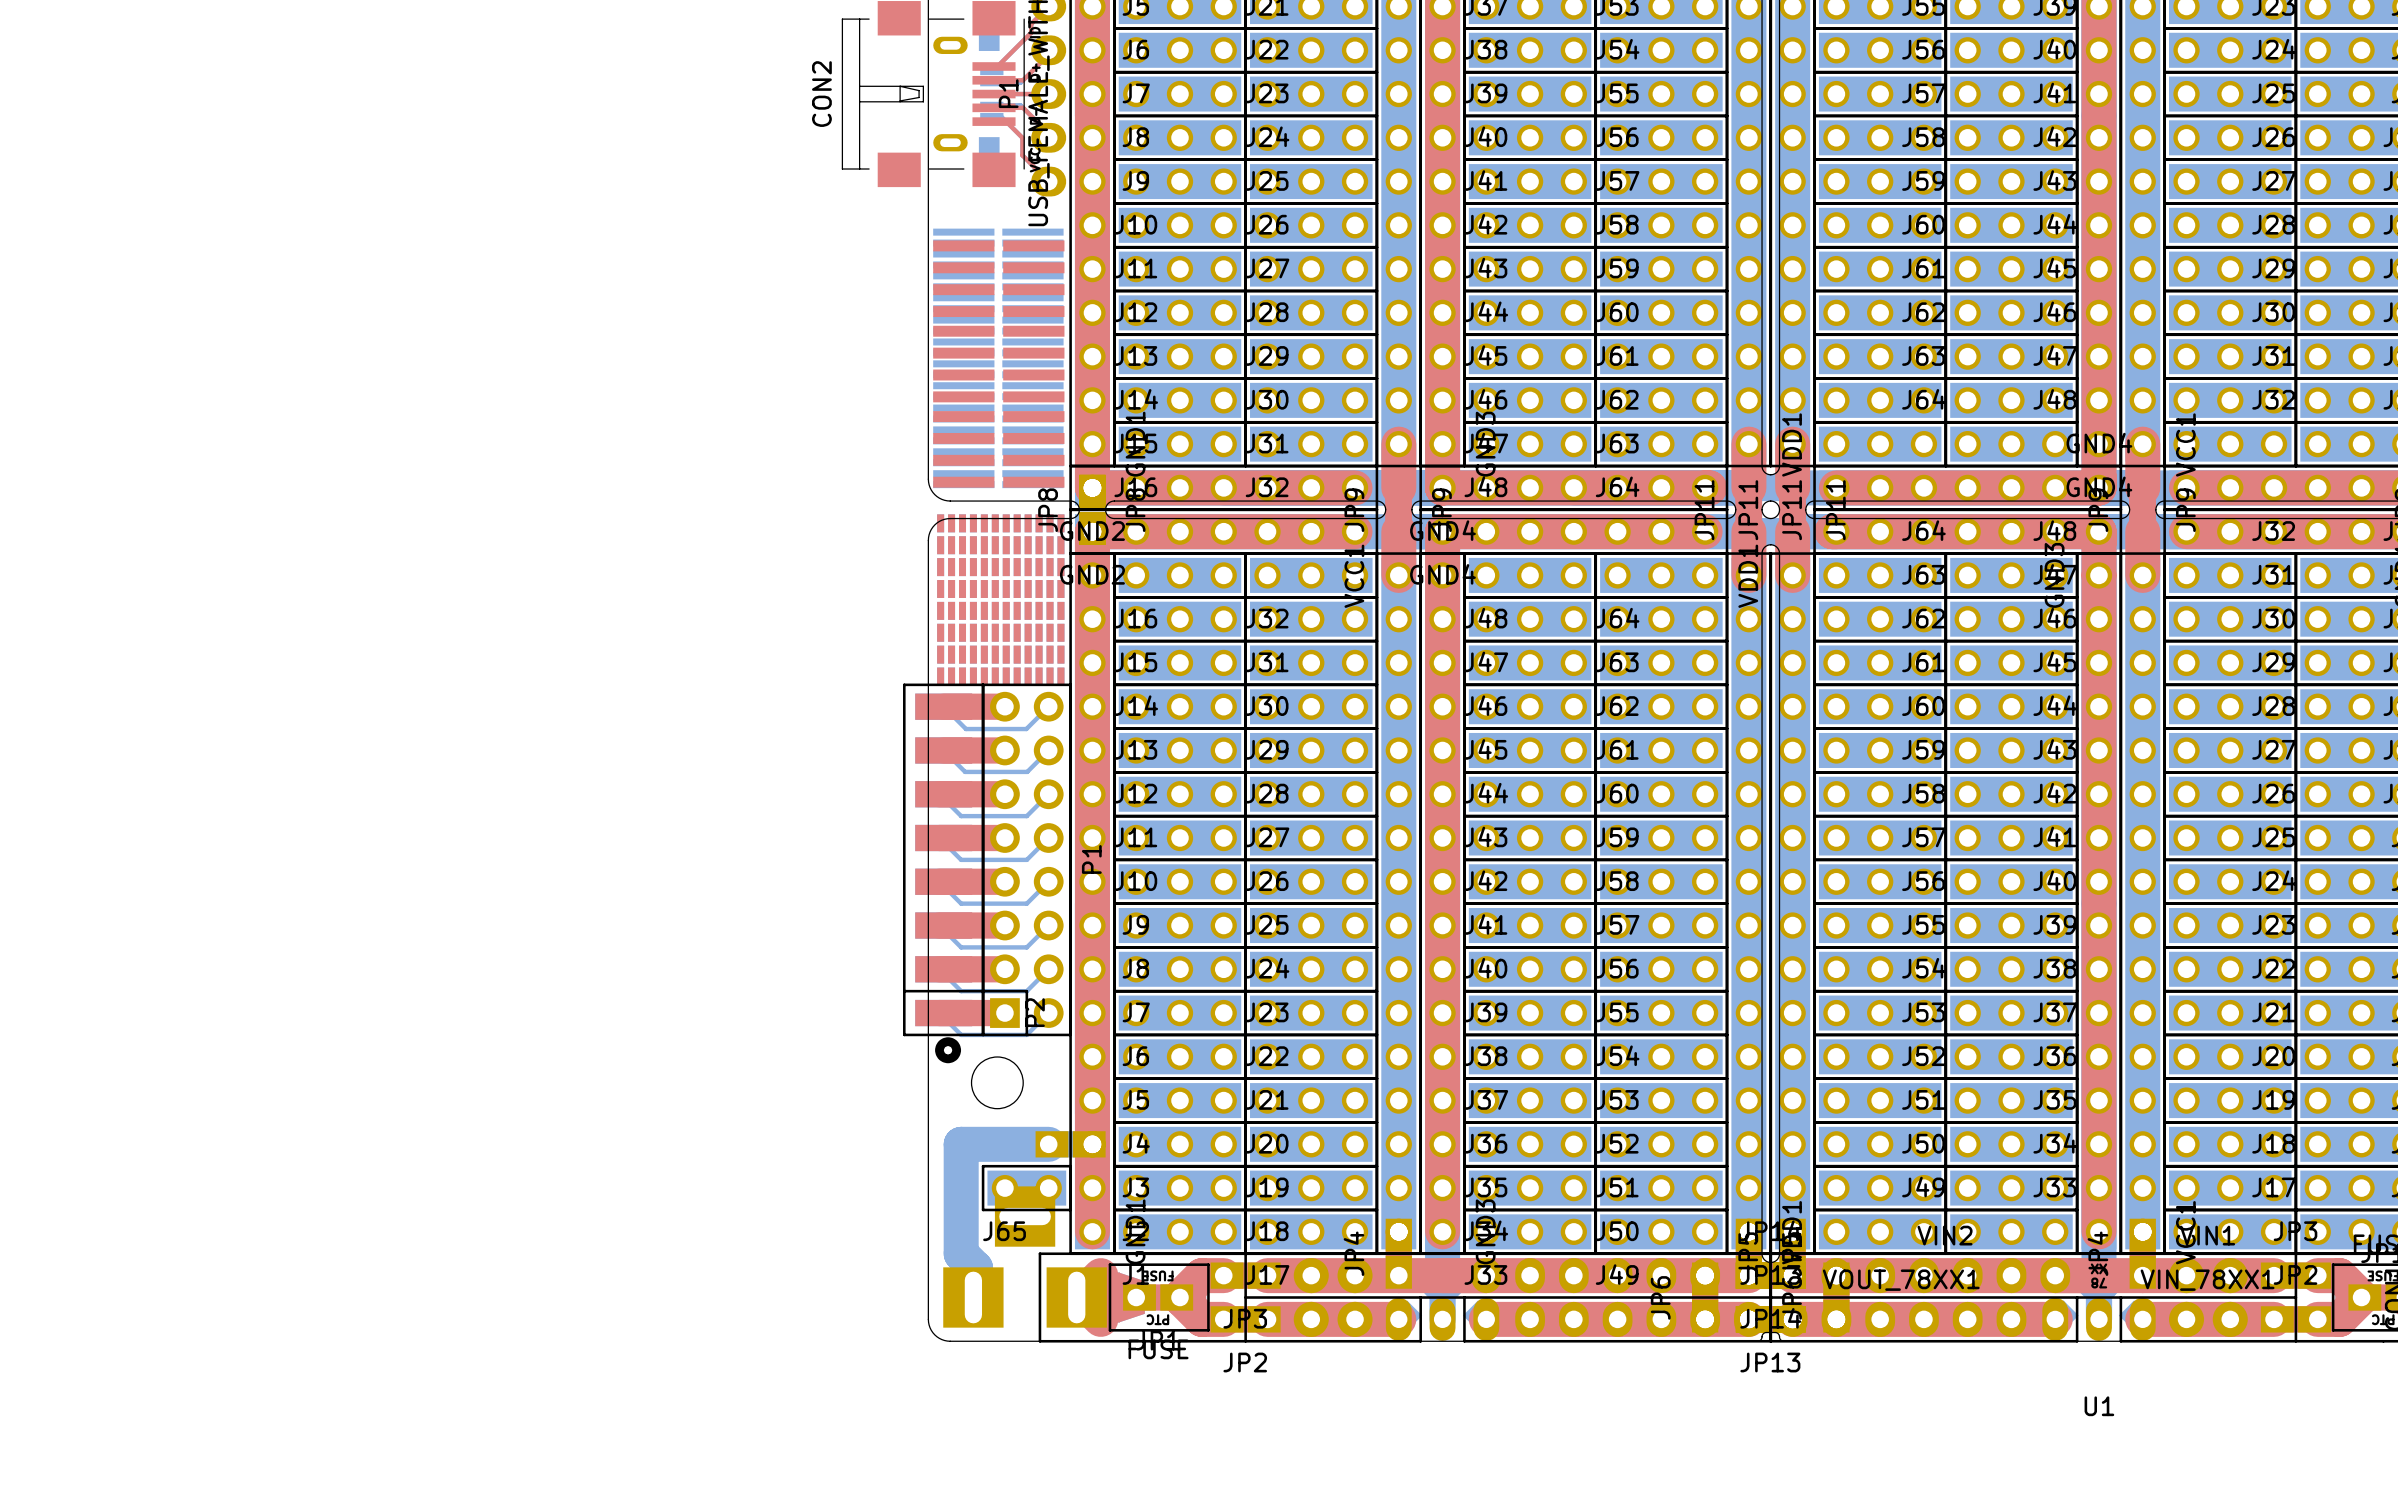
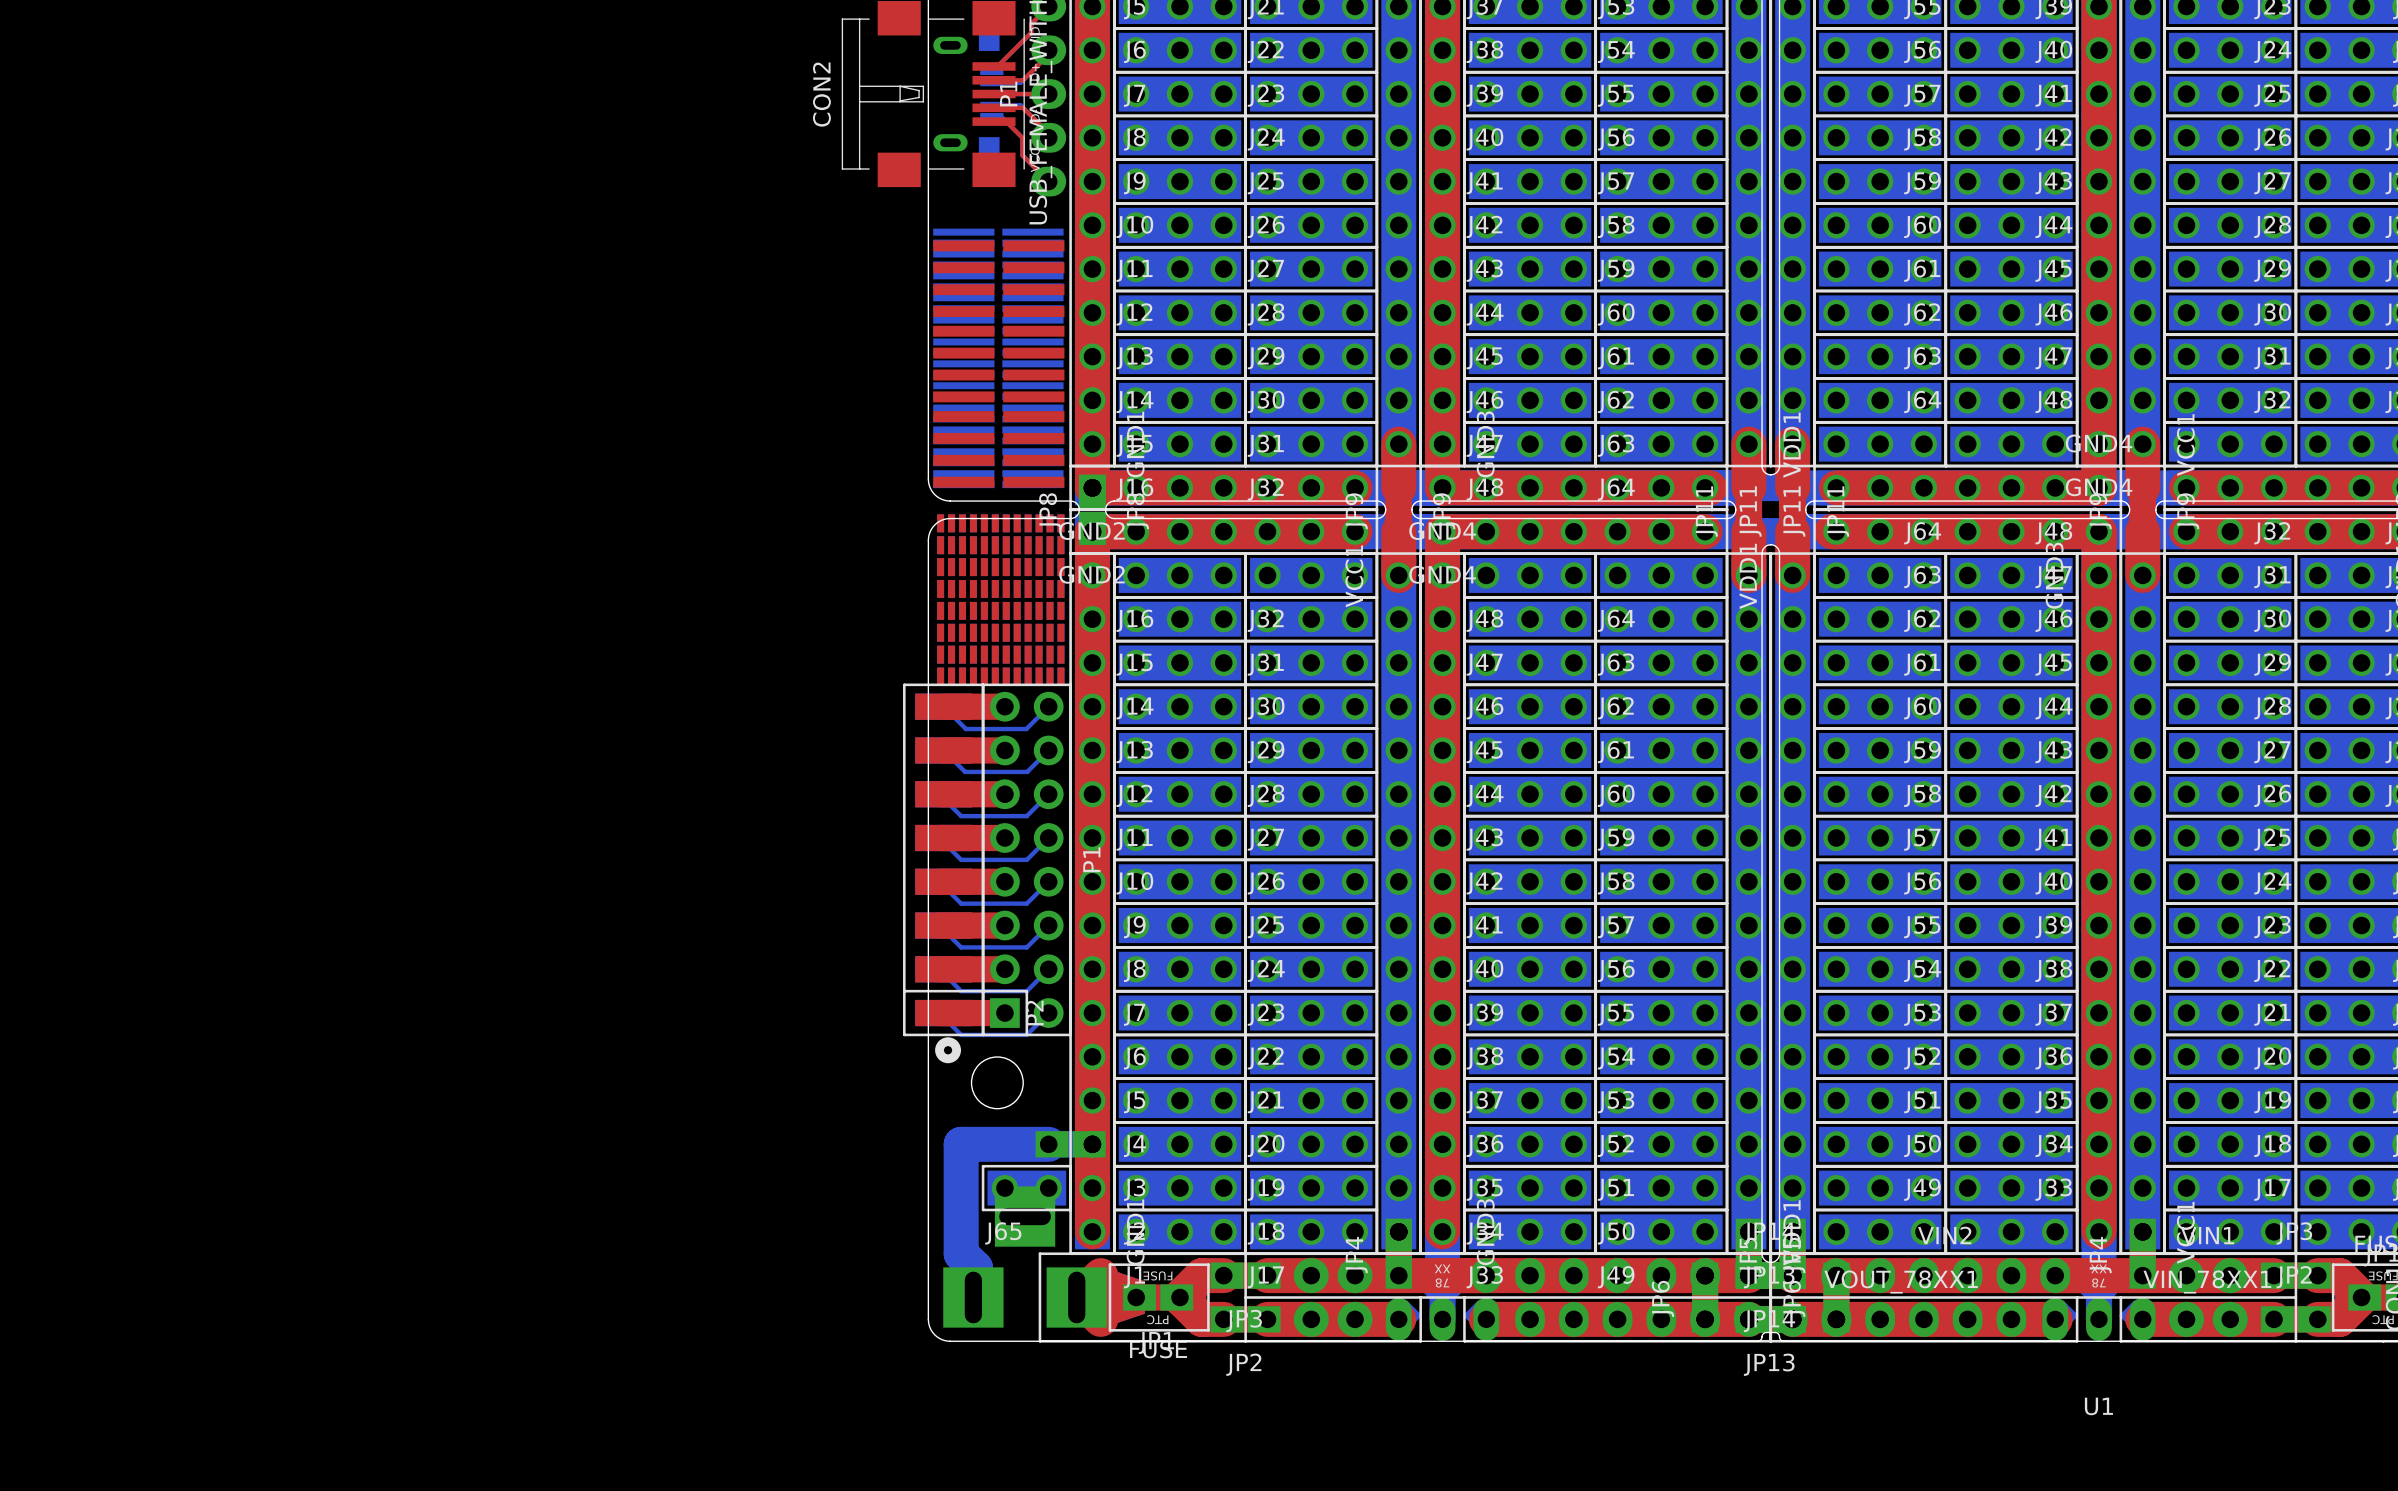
board edge: (1770, 501) (1776, 503) (1779, 509) (1776, 515) (1770, 518) (1764, 515) (1762, 509) (1764, 503) (1770, 501) -> none
text: none -> XX (1442, 1268)
text: none -> 78 (1442, 1282)

